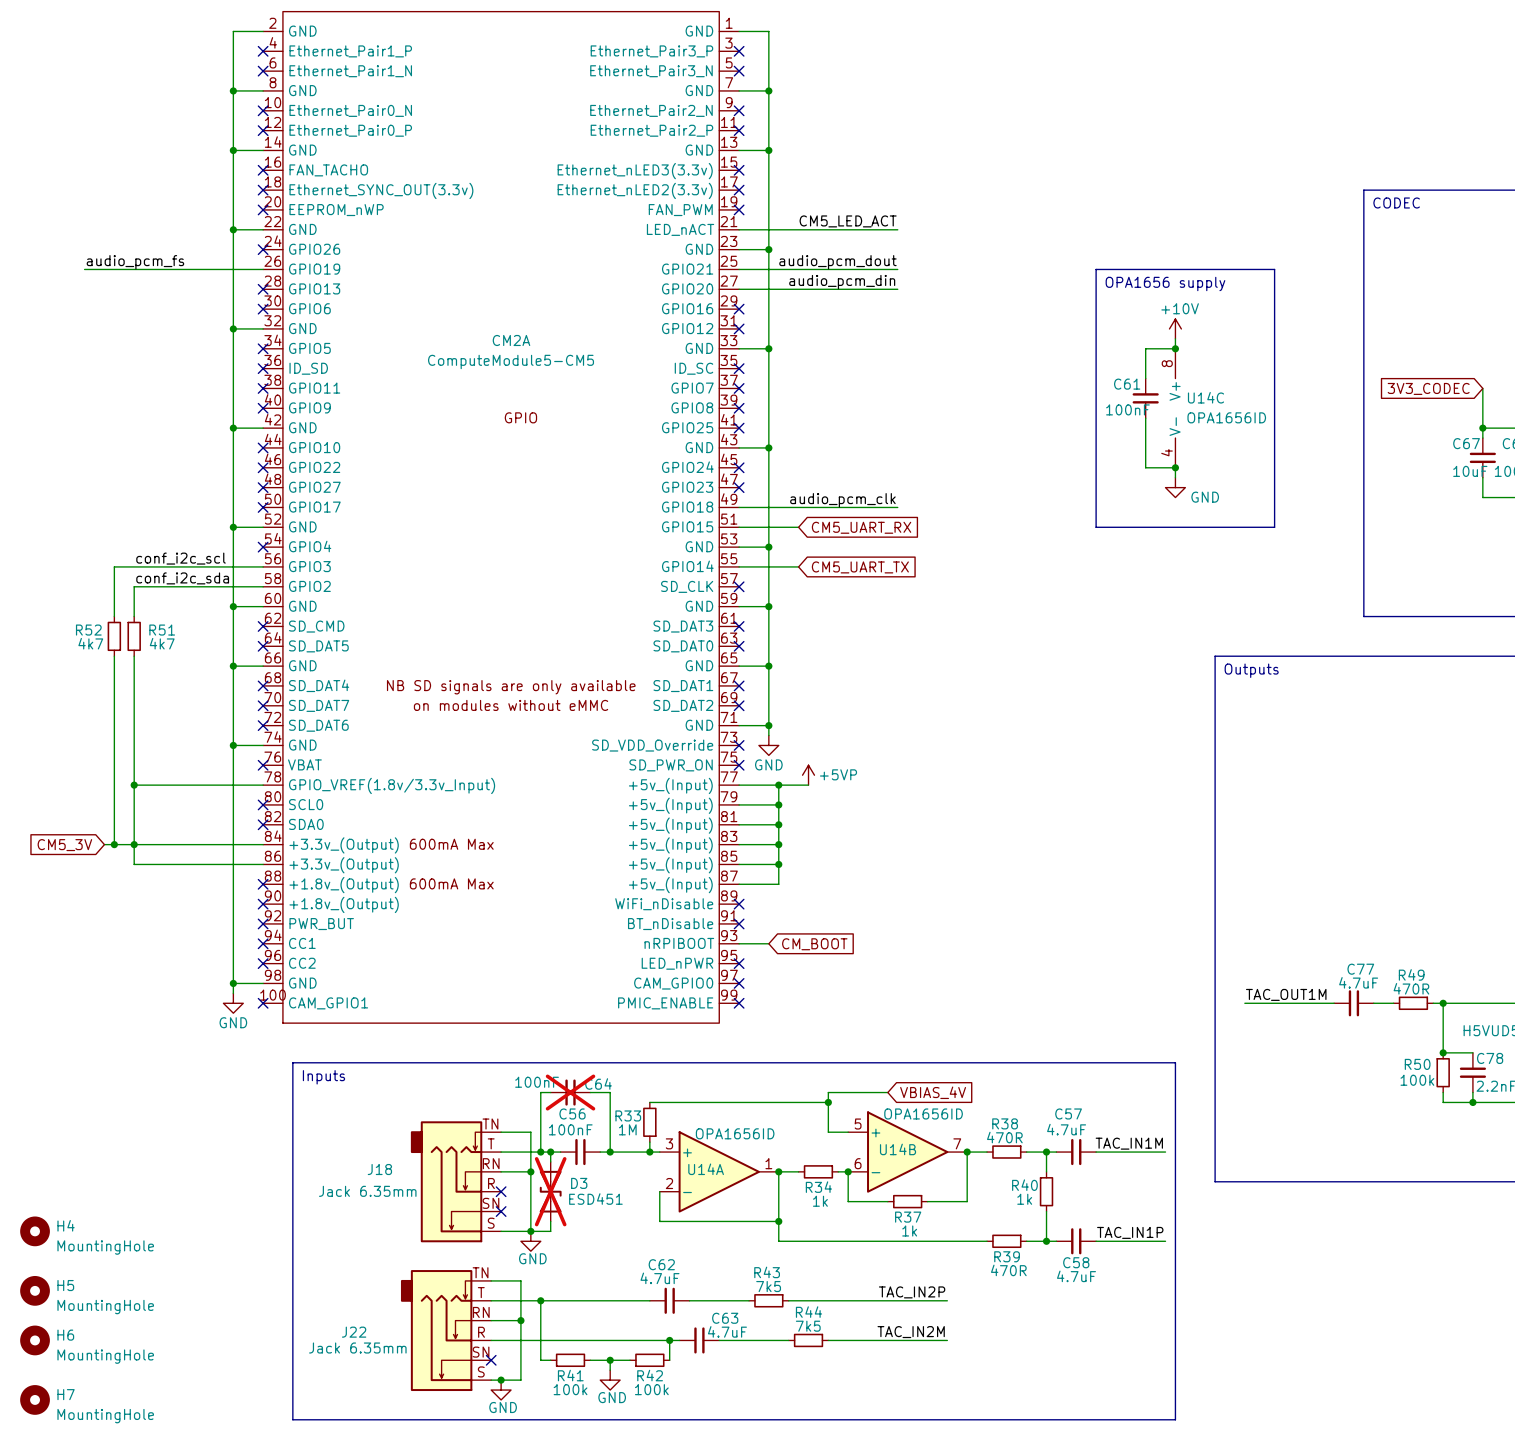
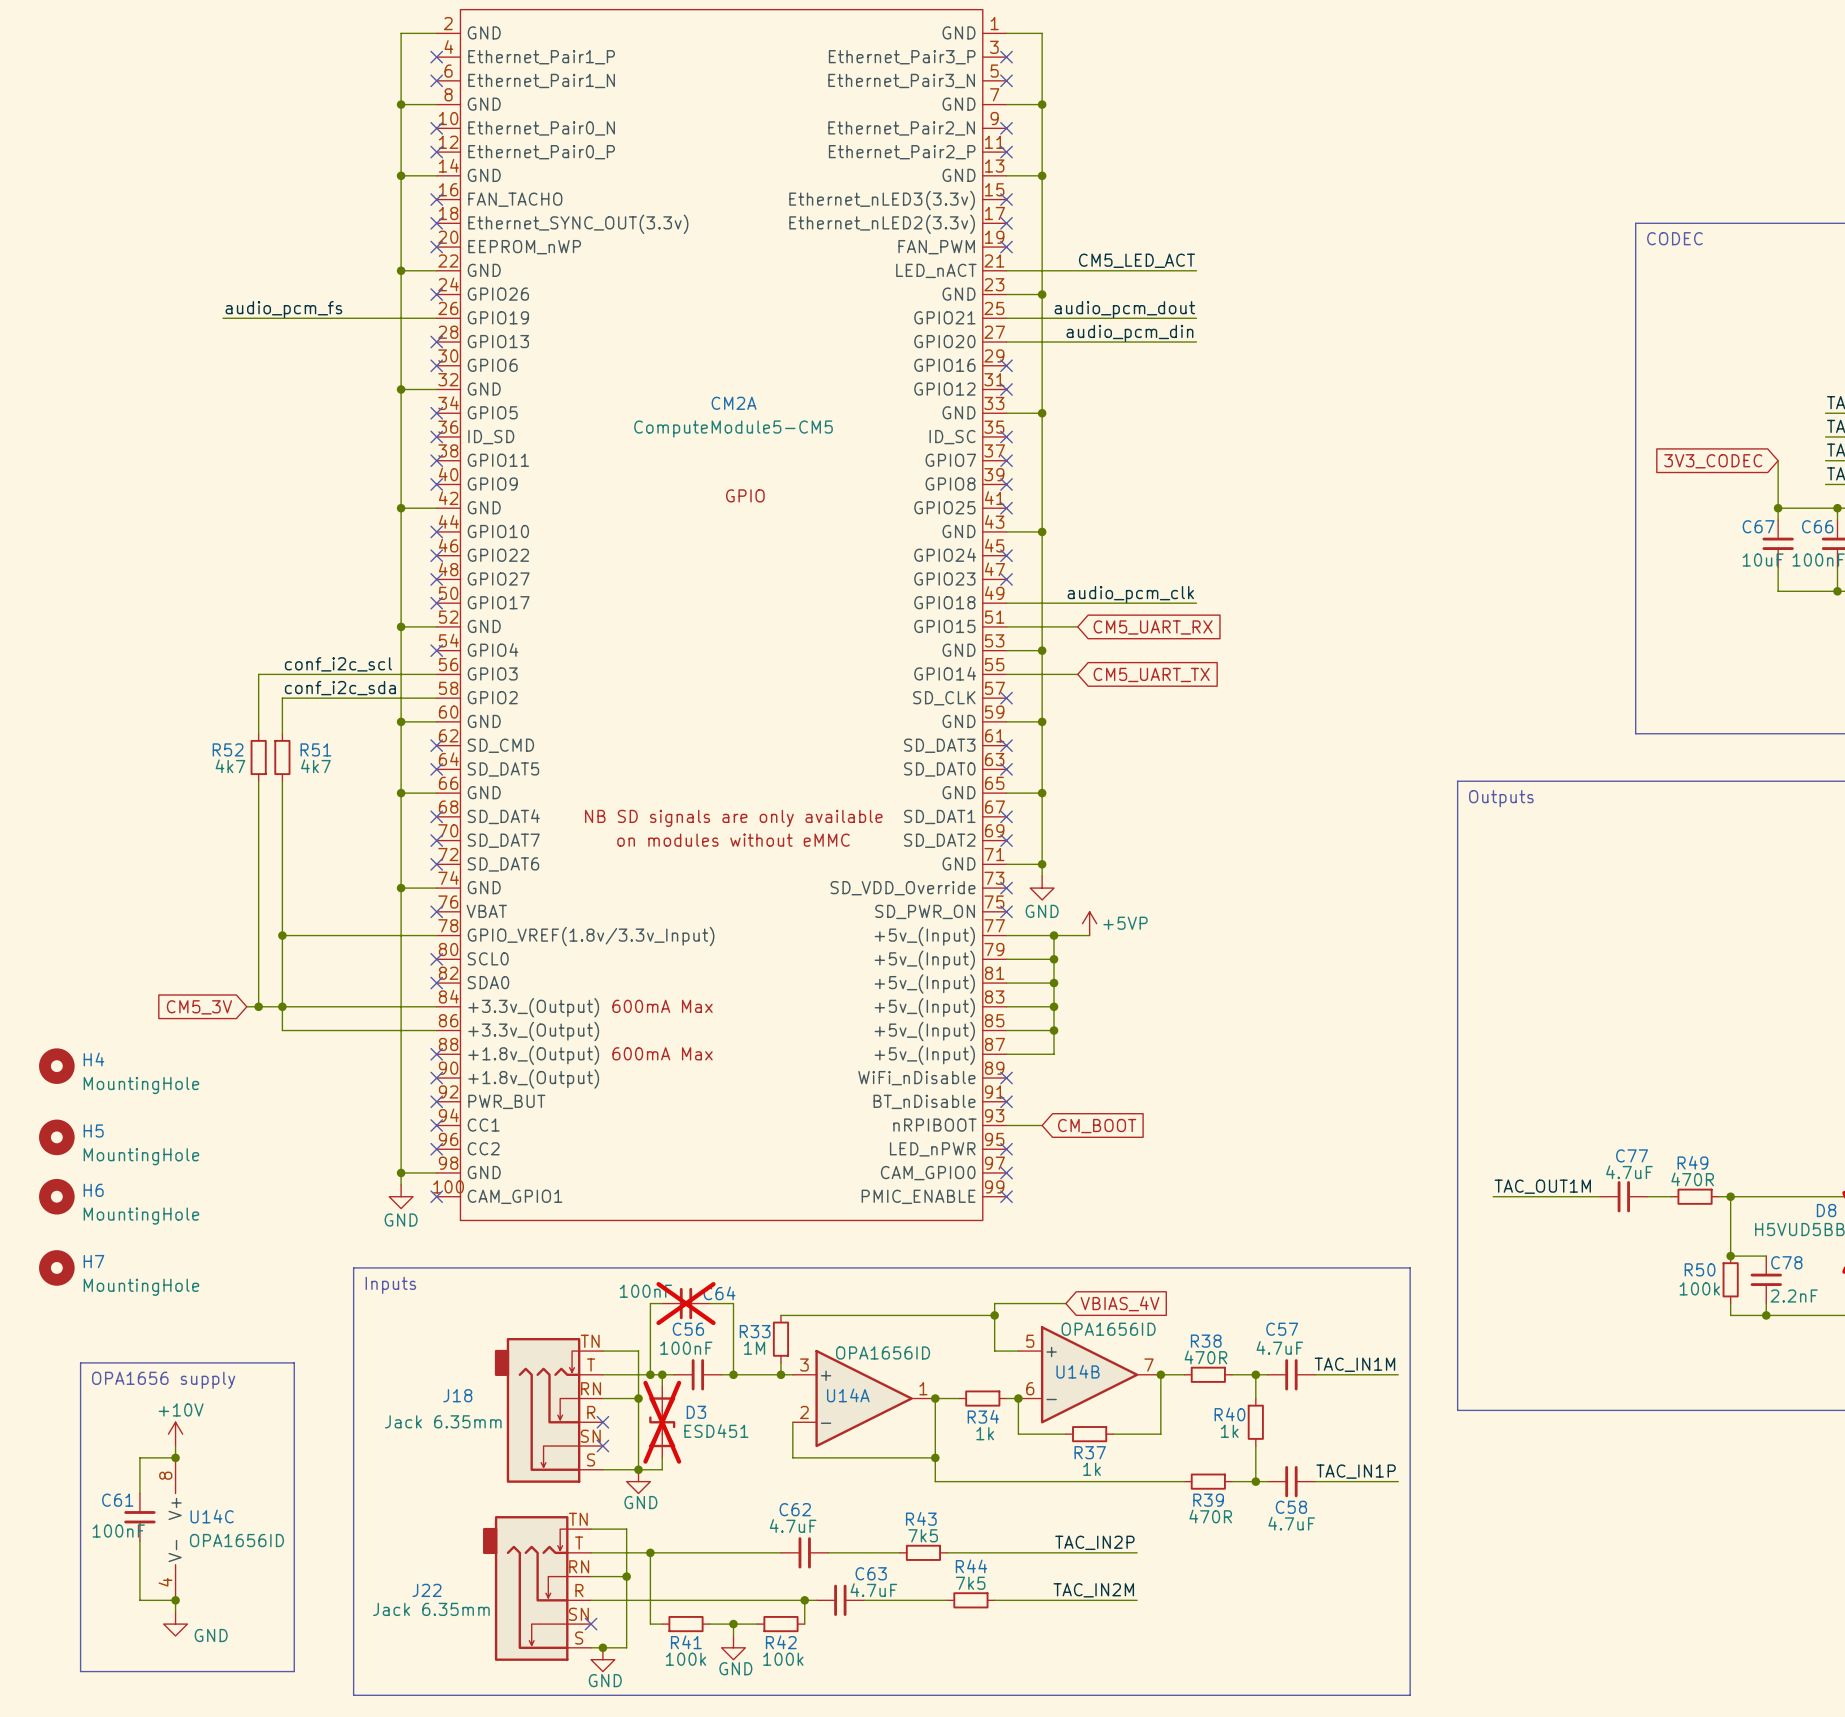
wire: (263, 31) (233, 31) (233, 586) (134, 586) (134, 616) -> none
wire: none -> (436, 33) (401, 33) (401, 1184)
wire: (739, 31) (768, 31) (768, 735) -> (1006, 33) (1042, 33) (1042, 876)
no-connect mark: (263, 51) -> none
no-connect mark: none -> (436, 57)
no-connect mark: (739, 51) -> none
no-connect mark: none -> (1006, 57)
no-connect mark: (263, 71) -> none
no-connect mark: none -> (436, 80)
no-connect mark: (739, 71) -> none
no-connect mark: none -> (1006, 80)
wire: (233, 90) (263, 90) -> (401, 104) (436, 104)
junction: (233, 90) -> none
junction: none -> (401, 104)
wire: (739, 90) (768, 90) -> (1006, 104) (1042, 104)
junction: (768, 90) -> none
junction: none -> (1042, 104)
no-connect mark: (263, 110) -> none
no-connect mark: none -> (436, 128)
no-connect mark: (739, 110) -> none
no-connect mark: none -> (1006, 128)
no-connect mark: (263, 130) -> none
no-connect mark: none -> (436, 152)
no-connect mark: (739, 130) -> none
no-connect mark: none -> (1006, 152)
wire: (233, 150) (263, 150) -> (401, 175) (436, 175)
junction: (233, 150) -> none
junction: none -> (401, 175)
wire: (739, 150) (768, 150) -> (1006, 175) (1042, 175)
junction: (768, 150) -> none
junction: none -> (1042, 175)
no-connect mark: (263, 170) -> none
no-connect mark: none -> (436, 199)
no-connect mark: (739, 170) -> none
no-connect mark: none -> (1006, 199)
no-connect mark: (263, 190) -> none
no-connect mark: none -> (436, 223)
no-connect mark: (739, 190) -> none
no-connect mark: none -> (1006, 223)
no-connect mark: (263, 209) -> none
no-connect mark: none -> (436, 247)
no-connect mark: (739, 209) -> none
no-connect mark: none -> (1006, 247)
label position: CM5_LED_ACT (848, 221) -> CM5_LED_ACT (1137, 260)
wire: (233, 229) (263, 229) -> (401, 270) (436, 270)
junction: (233, 229) -> none
junction: none -> (401, 270)
wire: (739, 229) (838, 229) -> (1077, 270) (1196, 270)
no-connect mark: (263, 249) -> none
no-connect mark: none -> (436, 294)
wire: (739, 249) (768, 249) -> (1006, 294) (1042, 294)
junction: (768, 249) -> none
junction: none -> (1042, 294)
label position: audio_pcm_fs (135, 262) -> audio_pcm_fs (283, 309)
label position: audio_pcm_dout (837, 262) -> audio_pcm_dout (1124, 309)
wire: (84, 269) (183, 269) -> (318, 318) (436, 318)
wire: (739, 269) (838, 269) -> (1077, 318) (1196, 318)
line: (1096, 269) (1274, 269) (1274, 527) (1096, 527) (1096, 269) -> none
label position: audio_pcm_din (842, 282) -> audio_pcm_din (1129, 333)
text: OPA1656 supply (1165, 283) -> none
no-connect mark: (263, 289) -> none
no-connect mark: none -> (436, 342)
wire: (739, 289) (838, 289) -> (1077, 342) (1196, 342)
no-connect mark: (263, 309) -> none
no-connect mark: none -> (436, 365)
no-connect mark: (739, 309) -> none
no-connect mark: none -> (1006, 365)
wire: (233, 328) (263, 328) -> (401, 389) (436, 389)
junction: (233, 328) -> none
junction: none -> (401, 389)
no-connect mark: (739, 328) -> none
no-connect mark: none -> (1006, 389)
power symbol: +10V (1175, 328) -> none
wire: (1175, 338) (1175, 348) (1145, 348) (1145, 378) -> none
no-connect mark: (263, 348) -> none
no-connect mark: none -> (436, 413)
wire: (739, 348) (768, 348) -> (1006, 413) (1042, 413)
junction: (768, 348) -> none
junction: none -> (1042, 413)
junction: (1175, 348) -> none
no-connect mark: (263, 368) -> none
no-connect mark: none -> (436, 436)
no-connect mark: (739, 368) -> none
no-connect mark: none -> (1006, 436)
no-connect mark: (263, 388) -> none
no-connect mark: none -> (436, 460)
no-connect mark: (739, 388) -> none
no-connect mark: none -> (1006, 460)
C61 position: (1145, 398) -> (139, 1517)
no-connect mark: (263, 408) -> none
no-connect mark: none -> (436, 484)
no-connect mark: (739, 408) -> none
no-connect mark: none -> (1006, 484)
U14C position: (1175, 408) -> (175, 1529)
wire: (1145, 418) (1145, 467) (1175, 467) (1175, 477) -> none
wire: (233, 428) (263, 428) -> (401, 508) (436, 508)
junction: (233, 428) -> none
junction: none -> (401, 508)
no-connect mark: (739, 428) -> none
no-connect mark: none -> (1006, 508)
no-connect mark: (263, 447) -> none
no-connect mark: none -> (436, 531)
wire: (739, 447) (768, 447) -> (1006, 531) (1042, 531)
junction: (768, 447) -> none
junction: none -> (1042, 531)
no-connect mark: (263, 467) -> none
no-connect mark: none -> (436, 555)
no-connect mark: (739, 467) -> none
no-connect mark: none -> (1006, 555)
junction: (1175, 467) -> none
no-connect mark: (263, 487) -> none
no-connect mark: none -> (436, 579)
no-connect mark: (739, 487) -> none
no-connect mark: none -> (1006, 579)
power symbol: GND (1175, 487) -> none
label position: audio_pcm_clk (842, 500) -> audio_pcm_clk (1130, 594)
no-connect mark: (263, 507) -> none
no-connect mark: none -> (436, 603)
wire: (739, 507) (838, 507) -> (1077, 603) (1196, 603)
CM2A position: (501, 517) -> (721, 615)
wire: (233, 527) (263, 527) -> (401, 626) (436, 626)
junction: (233, 527) -> none
junction: none -> (401, 626)
wire: (739, 527) (798, 527) -> (1006, 626) (1077, 626)
global label position: CM5_UART_RX (861, 527) -> CM5_UART_RX (1153, 627)
no-connect mark: (263, 547) -> none
no-connect mark: none -> (436, 650)
wire: (739, 547) (768, 547) -> (1006, 650) (1042, 650)
junction: (768, 547) -> none
junction: none -> (1042, 650)
label position: conf_i2c_scl (181, 558) -> conf_i2c_scl (338, 664)
wire: (213, 566) (114, 566) (114, 616) -> (258, 674) (258, 733)
wire: none -> (318, 674) (436, 674)
wire: (739, 566) (798, 566) -> (1006, 674) (1077, 674)
global label position: CM5_UART_TX (860, 567) -> CM5_UART_TX (1151, 674)
label position: conf_i2c_sda (182, 578) -> conf_i2c_sda (340, 688)
wire: none -> (318, 698) (436, 698)
no-connect mark: (739, 586) -> none
no-connect mark: none -> (1006, 698)
wire: (233, 606) (263, 606) -> (401, 721) (436, 721)
junction: (233, 606) -> none
junction: none -> (401, 721)
wire: (739, 606) (768, 606) -> (1006, 721) (1042, 721)
junction: (768, 606) -> none
junction: none -> (1042, 721)
wire: (233, 616) (233, 656) -> none
no-connect mark: (263, 626) -> none
no-connect mark: none -> (436, 745)
no-connect mark: (739, 626) -> none
no-connect mark: none -> (1006, 745)
R52 position: (114, 636) -> (258, 757)
R51 position: (134, 636) -> (282, 757)
no-connect mark: (263, 646) -> none
no-connect mark: none -> (436, 769)
no-connect mark: (739, 646) -> none
no-connect mark: none -> (1006, 769)
wire: (114, 656) (114, 844) -> (258, 781) (258, 1006)
wire: (134, 656) (134, 864) (233, 864) (233, 993) -> none
wire: (233, 666) (263, 666) -> (401, 793) (436, 793)
junction: (233, 666) -> none
junction: none -> (401, 793)
wire: (739, 666) (768, 666) -> (1006, 793) (1042, 793)
junction: (768, 666) -> none
junction: none -> (1042, 793)
no-connect mark: (263, 685) -> none
no-connect mark: none -> (436, 816)
no-connect mark: (739, 685) -> none
no-connect mark: none -> (1006, 816)
no-connect mark: (263, 705) -> none
no-connect mark: none -> (436, 840)
no-connect mark: (739, 705) -> none
no-connect mark: none -> (1006, 840)
no-connect mark: (263, 725) -> none
no-connect mark: none -> (436, 864)
wire: (739, 725) (768, 725) -> (1006, 864) (1042, 864)
junction: (768, 725) -> none
junction: none -> (1042, 864)
wire: (233, 745) (263, 745) -> (401, 888) (436, 888)
junction position: (233, 745) -> (282, 935)
junction: none -> (401, 888)
no-connect mark: (739, 745) -> none
power symbol position: GND (768, 745) -> GND (1042, 888)
no-connect mark: none -> (1006, 888)
no-connect mark: (263, 765) -> none
no-connect mark: none -> (436, 911)
no-connect mark: (739, 765) -> none
no-connect mark: none -> (1006, 911)
power symbol position: +5VP (808, 775) -> +5VP (1089, 923)
wire: (134, 785) (233, 785) -> (318, 935) (436, 935)
junction: (134, 785) -> none
wire: (739, 785) (808, 785) -> (1006, 935) (1089, 935)
wire: (778, 785) (778, 884) (739, 884) -> (1054, 935) (1054, 1054) (1006, 1054)
junction: (778, 785) -> none
junction: none -> (1054, 935)
no-connect mark: (263, 804) -> none
no-connect mark: none -> (436, 959)
wire: (739, 804) (778, 804) -> (1006, 959) (1054, 959)
junction: (778, 804) -> none
junction: none -> (1054, 959)
no-connect mark: (263, 824) -> none
no-connect mark: none -> (436, 983)
wire: (739, 824) (778, 824) -> (1006, 983) (1054, 983)
junction: (778, 824) -> none
junction: none -> (1054, 983)
wire: (104, 844) (203, 844) -> (318, 1006) (436, 1006)
junction: (114, 844) -> none
junction: (134, 844) -> none
junction: none -> (258, 1006)
junction: none -> (282, 1006)
wire: (739, 844) (778, 844) -> (1006, 1006) (1054, 1006)
junction: (778, 844) -> none
junction: none -> (1054, 1006)
global label position: CM5_3V (64, 845) -> CM5_3V (199, 1007)
wire: none -> (318, 1030) (436, 1030)
wire: (739, 864) (778, 864) -> (1006, 1030) (1054, 1030)
junction: (778, 864) -> none
junction: none -> (1054, 1030)
no-connect mark: (263, 884) -> none
no-connect mark: none -> (436, 1054)
no-connect mark: (263, 904) -> none
no-connect mark: none -> (436, 1078)
no-connect mark: (739, 904) -> none
no-connect mark: none -> (1006, 1078)
no-connect mark: (263, 923) -> none
no-connect mark: none -> (436, 1101)
no-connect mark: (739, 923) -> none
no-connect mark: none -> (1006, 1101)
no-connect mark: (263, 943) -> none
no-connect mark: none -> (436, 1125)
wire: (739, 943) (768, 943) -> (1006, 1125) (1042, 1125)
global label position: CM_BOOT (814, 944) -> CM_BOOT (1097, 1126)
no-connect mark: (263, 963) -> none
no-connect mark: none -> (436, 1149)
no-connect mark: (739, 963) -> none
no-connect mark: none -> (1006, 1149)
wire: (233, 983) (263, 983) -> (401, 1172) (436, 1172)
junction: (233, 983) -> none
junction: none -> (401, 1172)
no-connect mark: (739, 983) -> none
no-connect mark: none -> (1006, 1172)
power symbol position: GND (233, 1003) -> GND (401, 1196)
no-connect mark: (263, 1003) -> none
no-connect mark: none -> (436, 1196)
no-connect mark: (739, 1003) -> none
no-connect mark: none -> (1006, 1196)
line: none -> (80, 1362) (294, 1362) (294, 1671) (80, 1671) (80, 1362)
text: none -> OPA1656 supply (163, 1380)
power symbol: none -> +10V (175, 1434)
wire: none -> (175, 1446) (175, 1457) (139, 1457) (139, 1493)
junction: none -> (175, 1457)
H4 position: (35, 1231) -> (56, 1066)
H5 position: (35, 1290) -> (56, 1137)
wire: none -> (139, 1540) (139, 1600) (175, 1600) (175, 1612)
H6 position: (35, 1340) -> (56, 1196)
junction: none -> (175, 1600)
power symbol: none -> GND (175, 1624)
H7 position: (35, 1399) -> (56, 1267)

